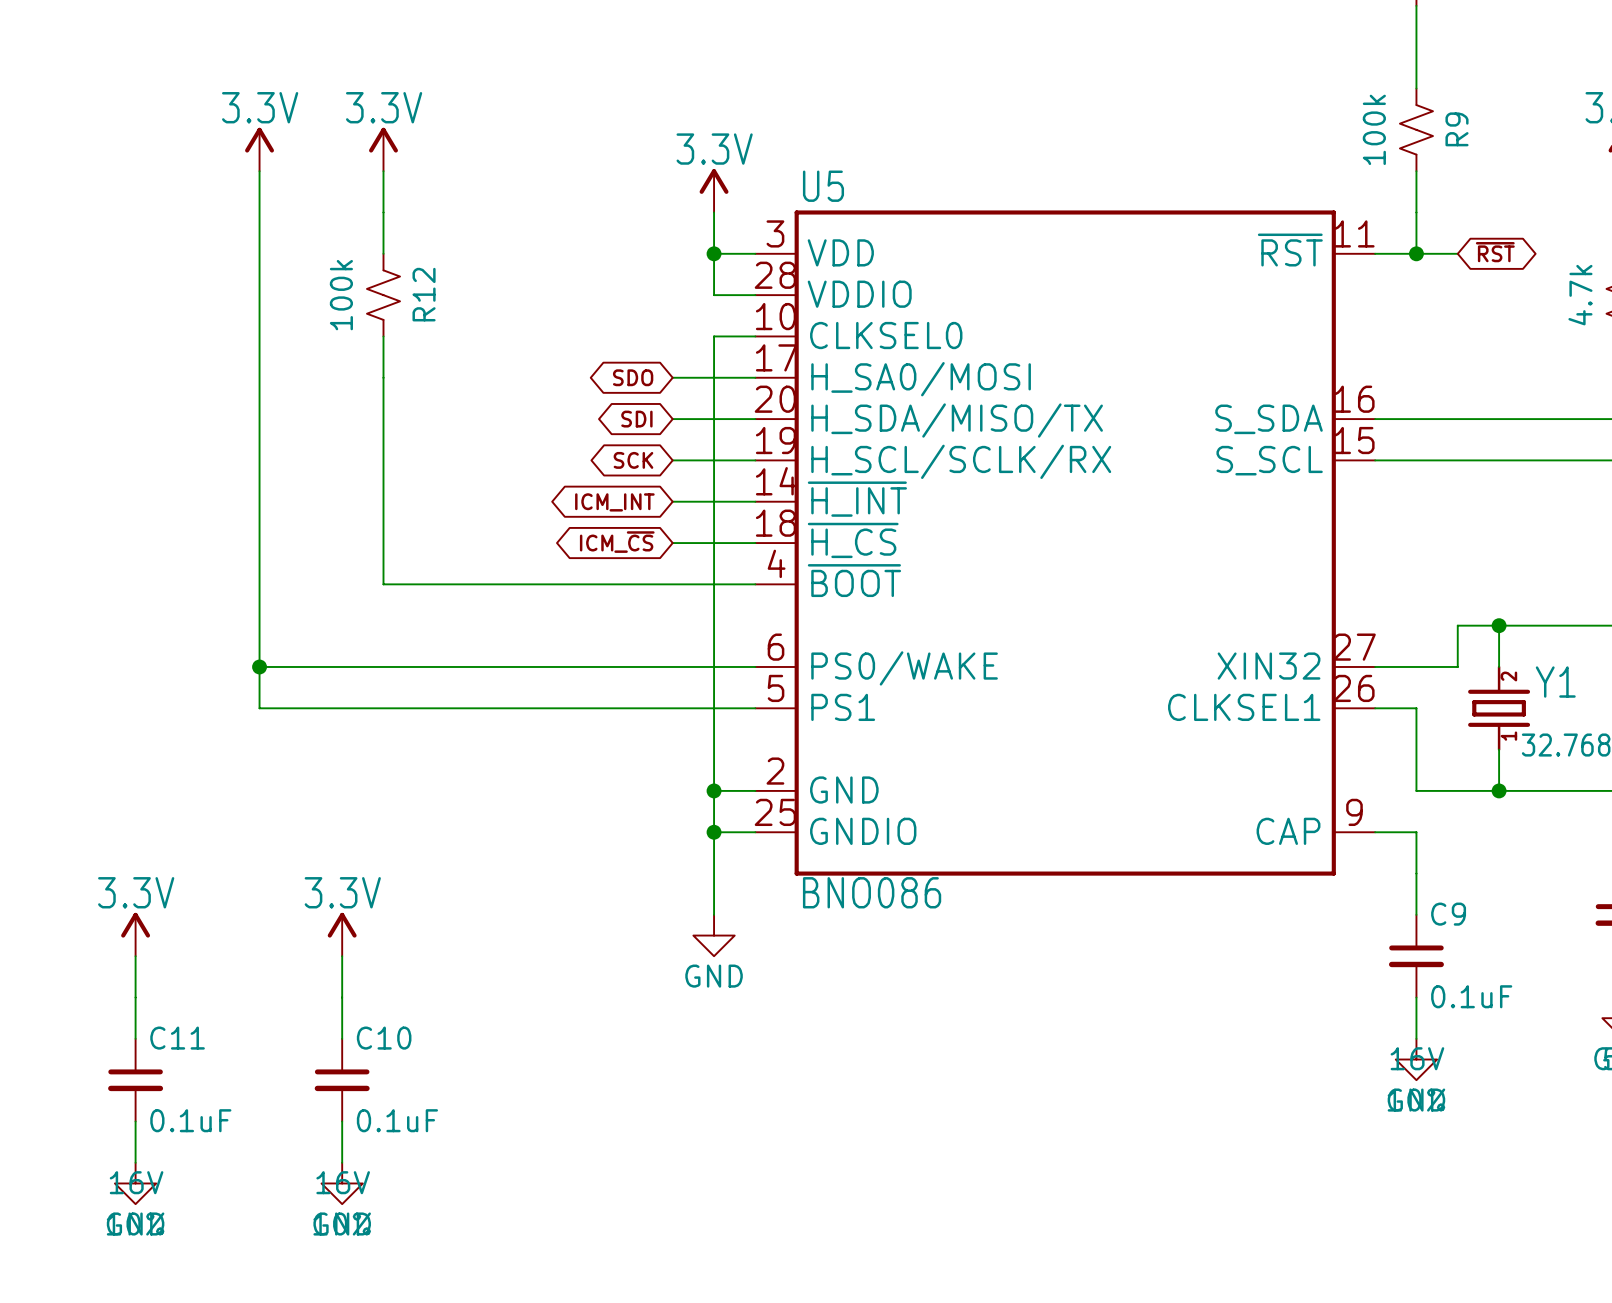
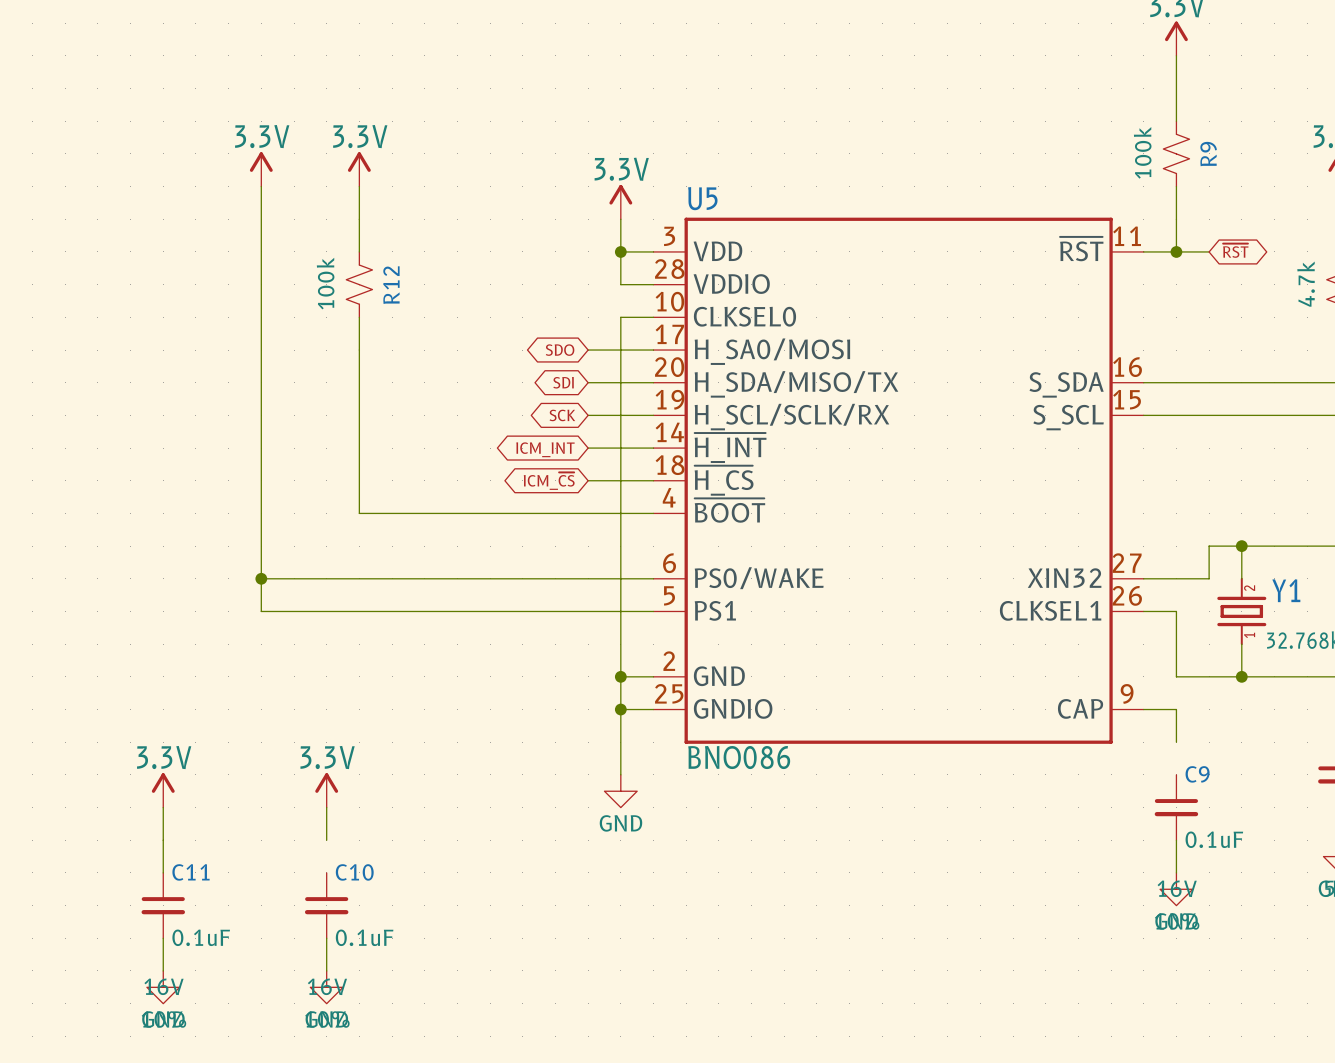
wire: (1416, 873) (1416, 914) -> none
wire: (342, 997) (342, 1038) -> none

